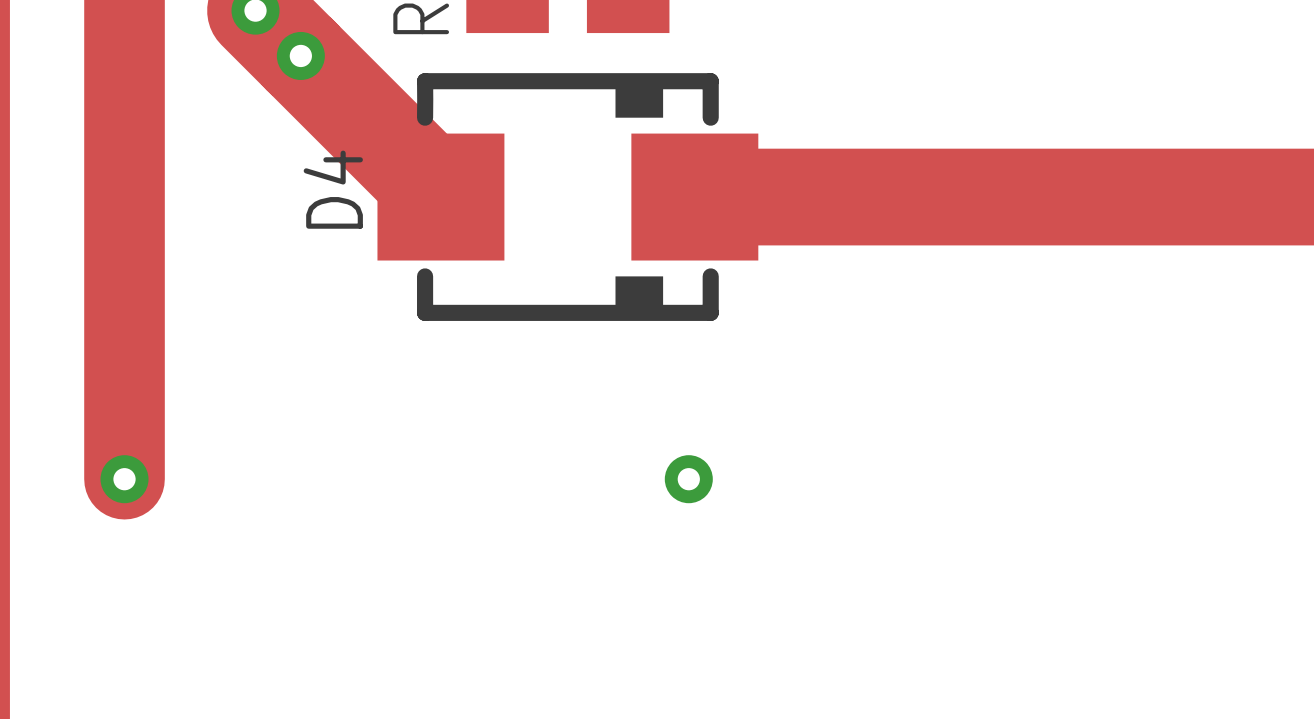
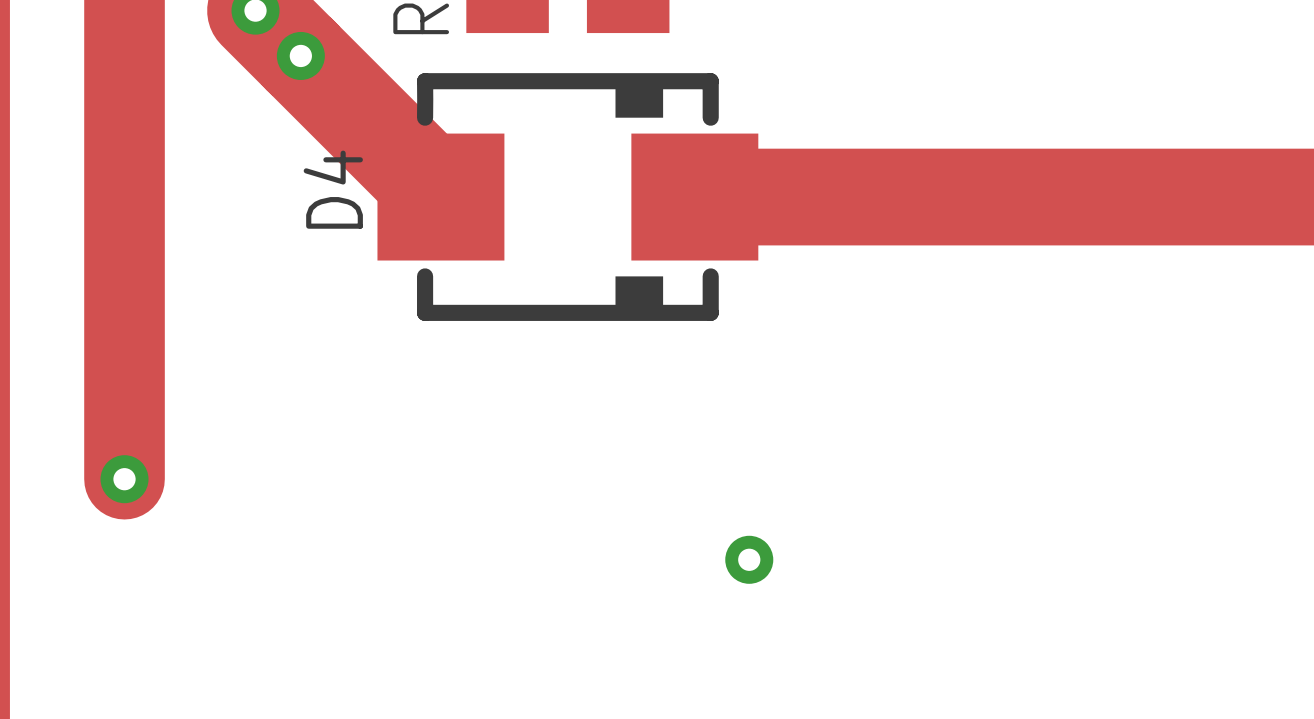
via position: (688, 479) -> (749, 559)

